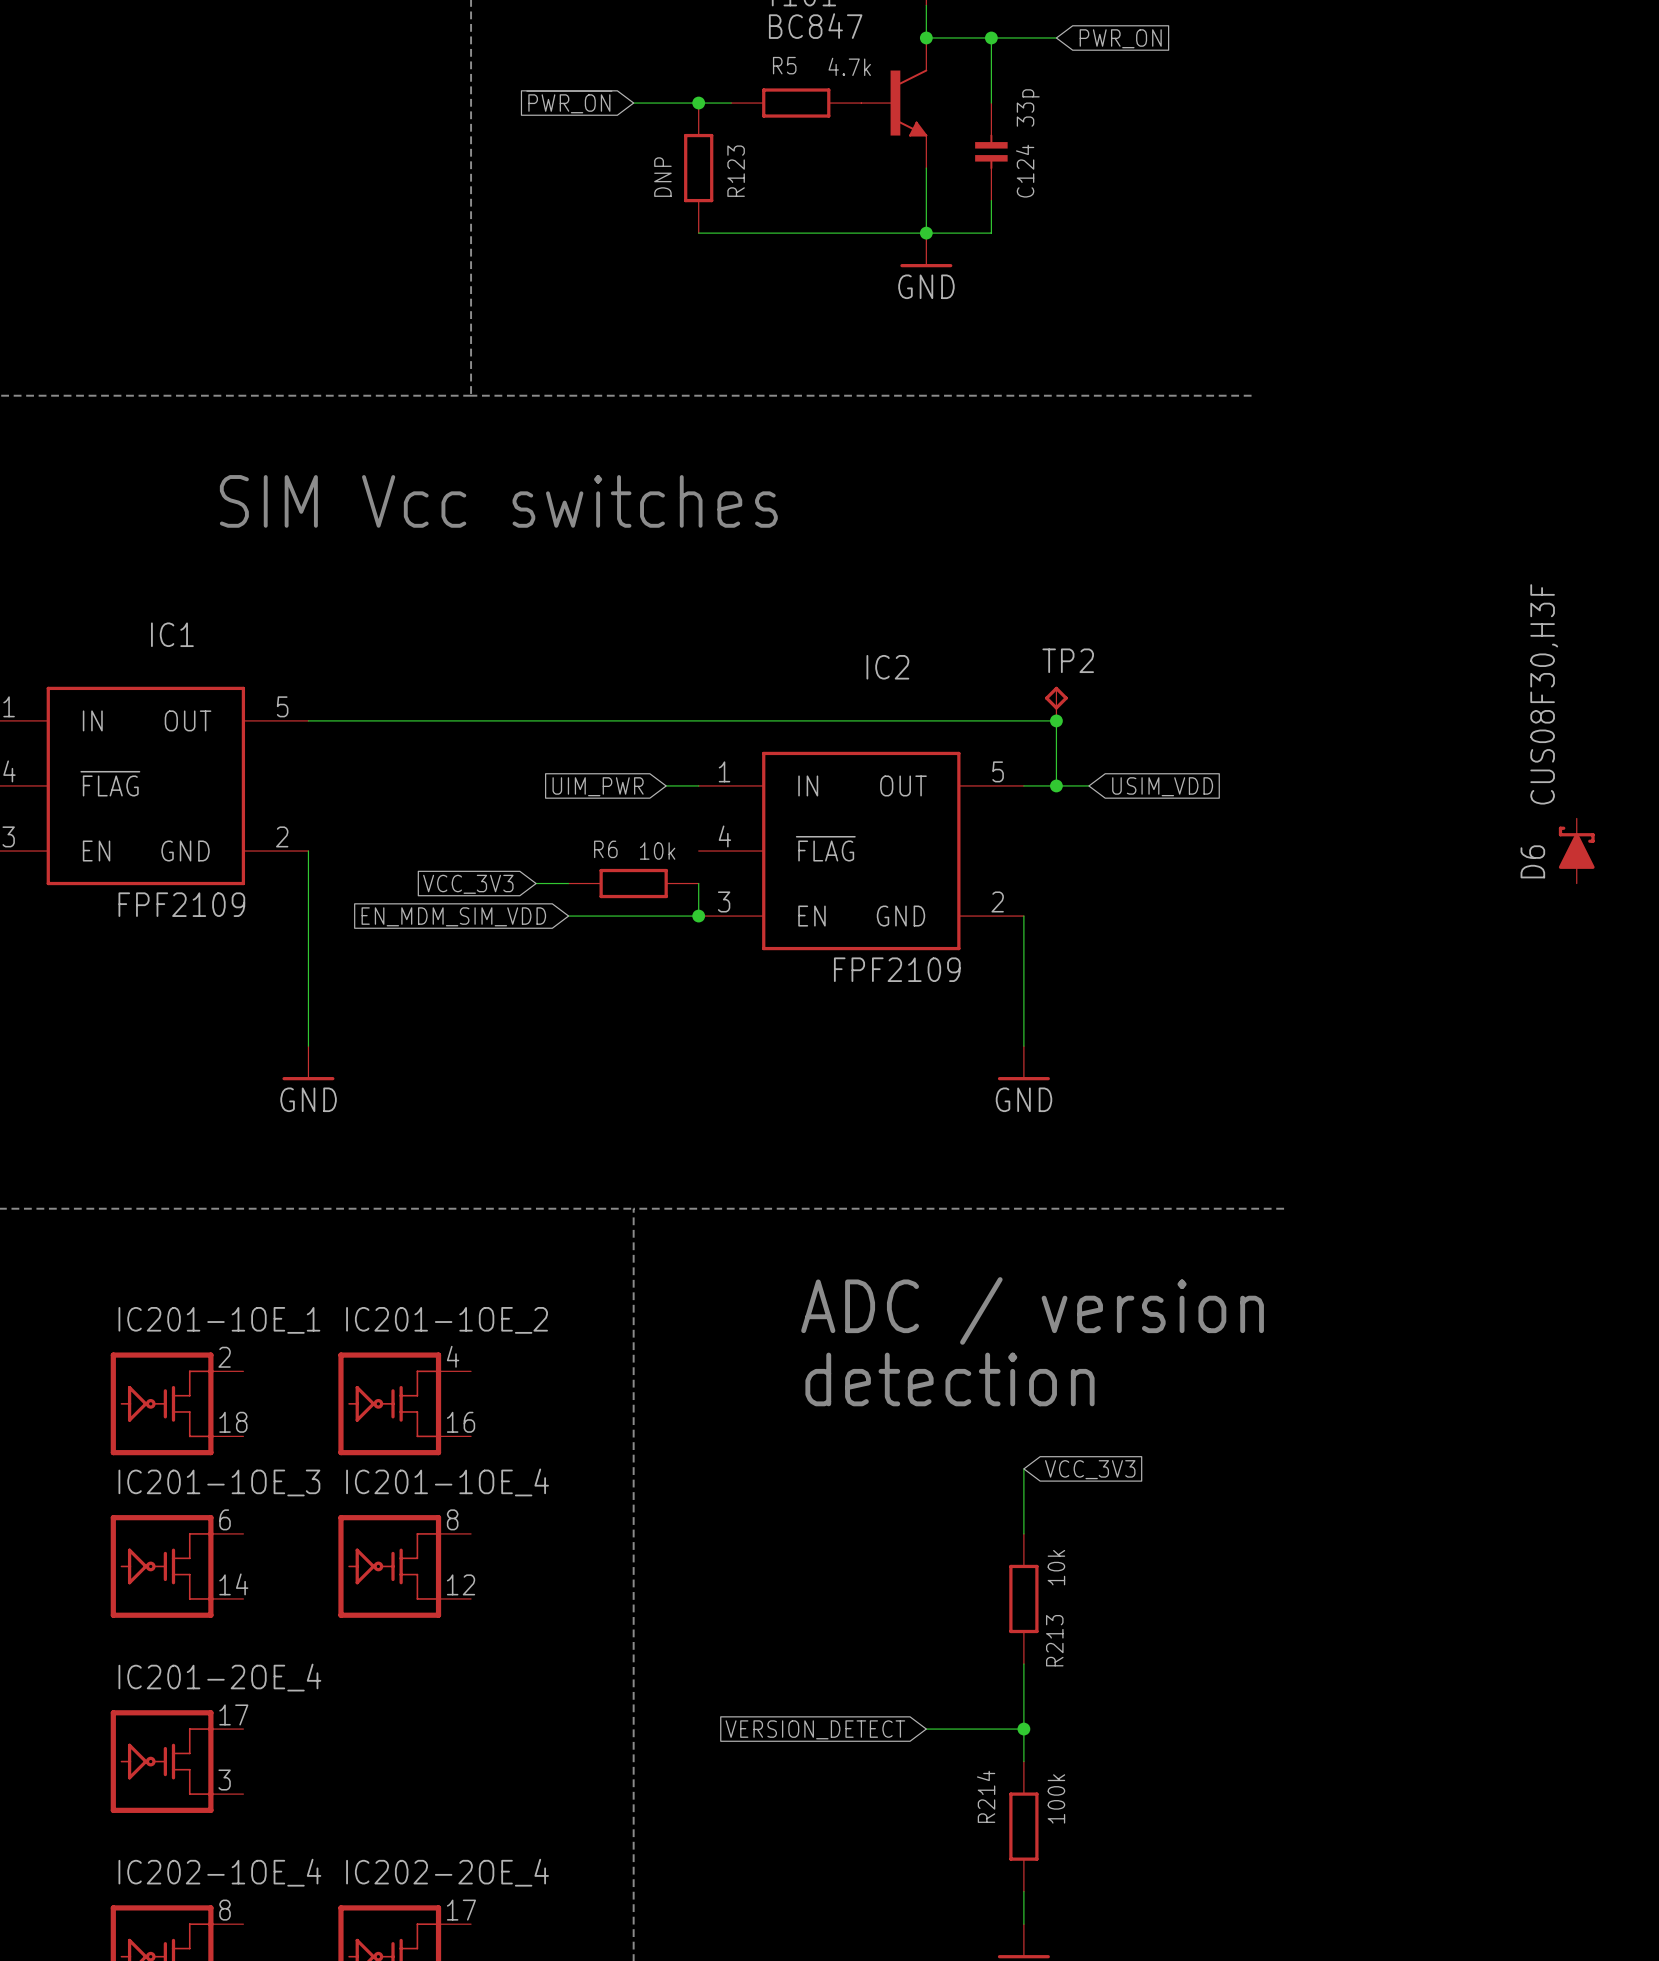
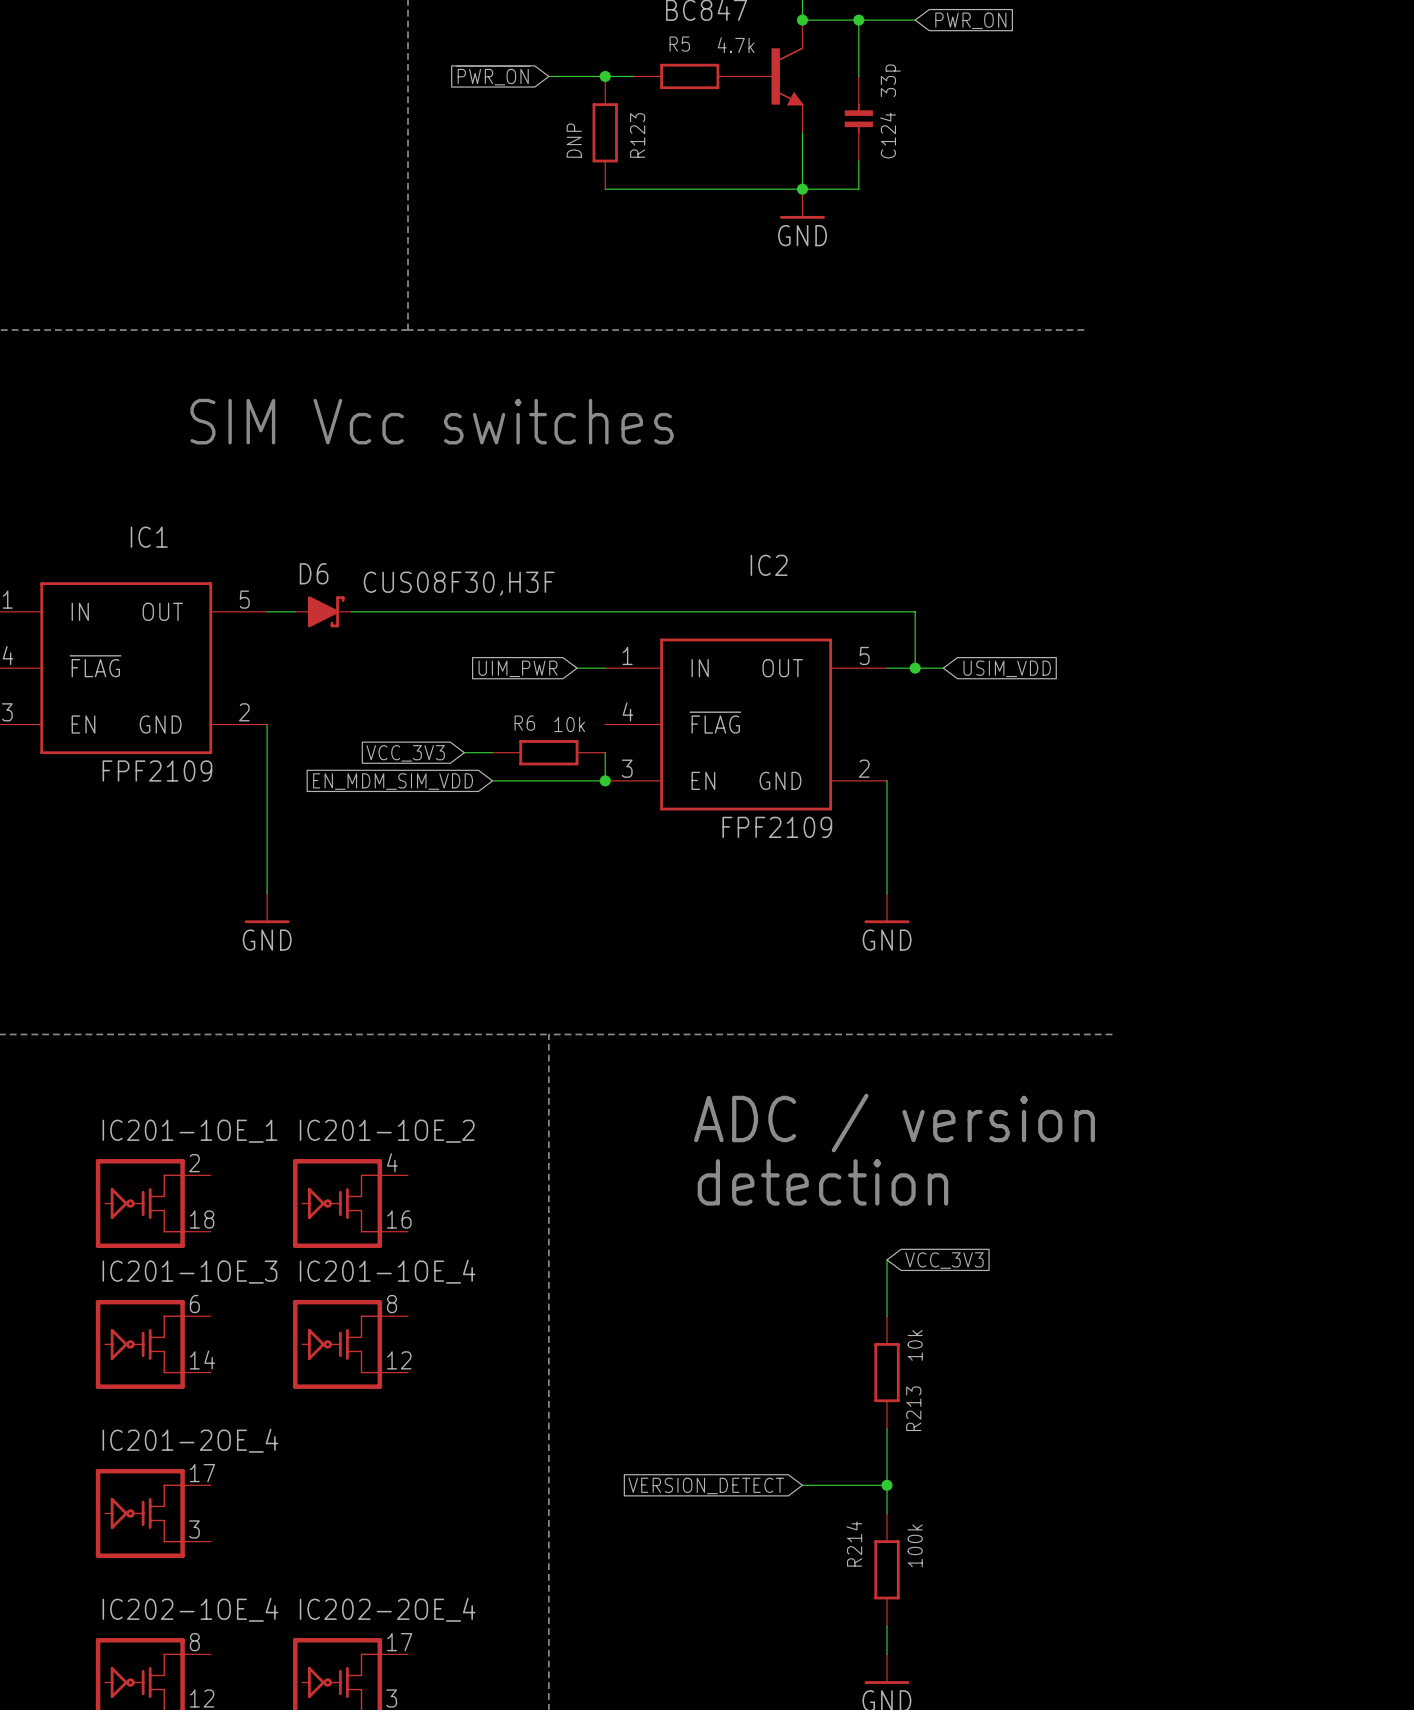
TP2: (1056, 703) -> none
junction: (1056, 720) -> none
D6 rotation: 0° (1576, 847) -> 90° clockwise (326, 611)
D6 position: (1576, 851) -> (323, 611)

